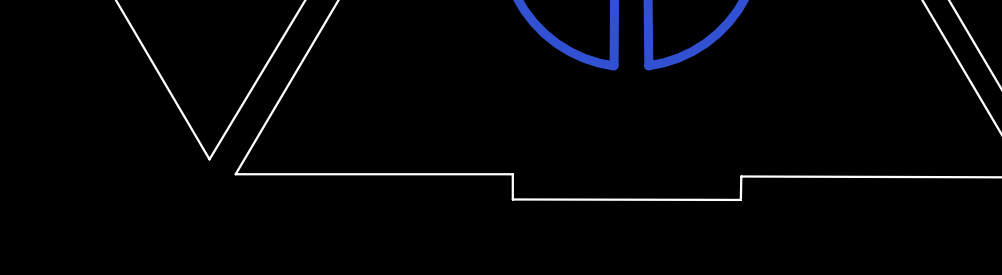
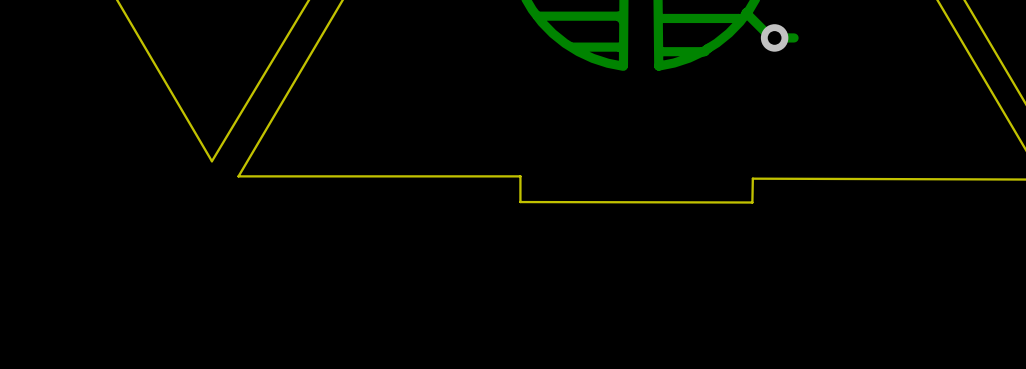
track: none -> (745, 12) (771, 37) (794, 37)
track: none -> (537, 16) (618, 16) (622, 19)
track: none -> (661, 18) (740, 19)
via: none -> (774, 37)
track: none -> (572, 47) (621, 48)
track: none -> (708, 48) (704, 51) (660, 51)

